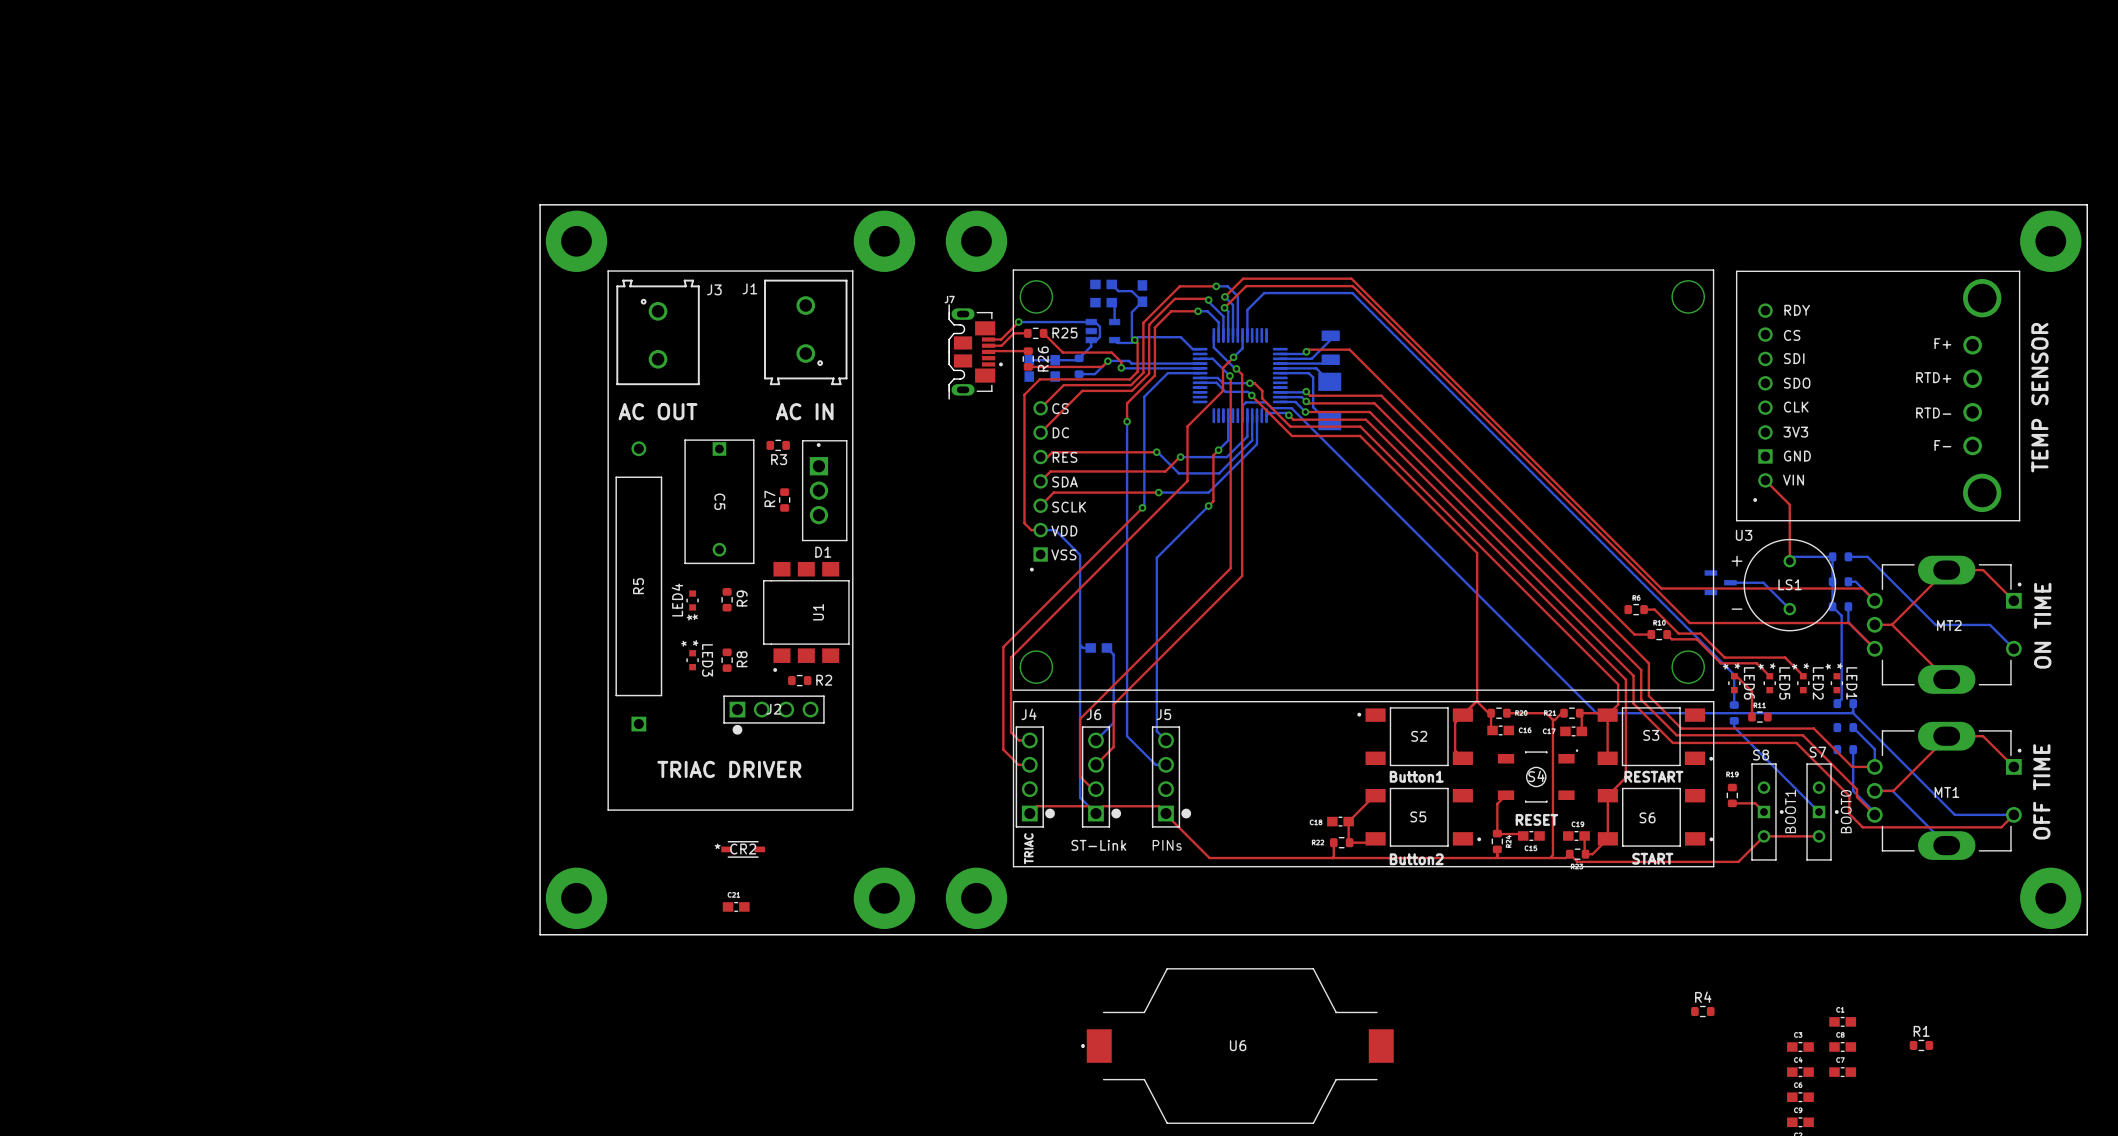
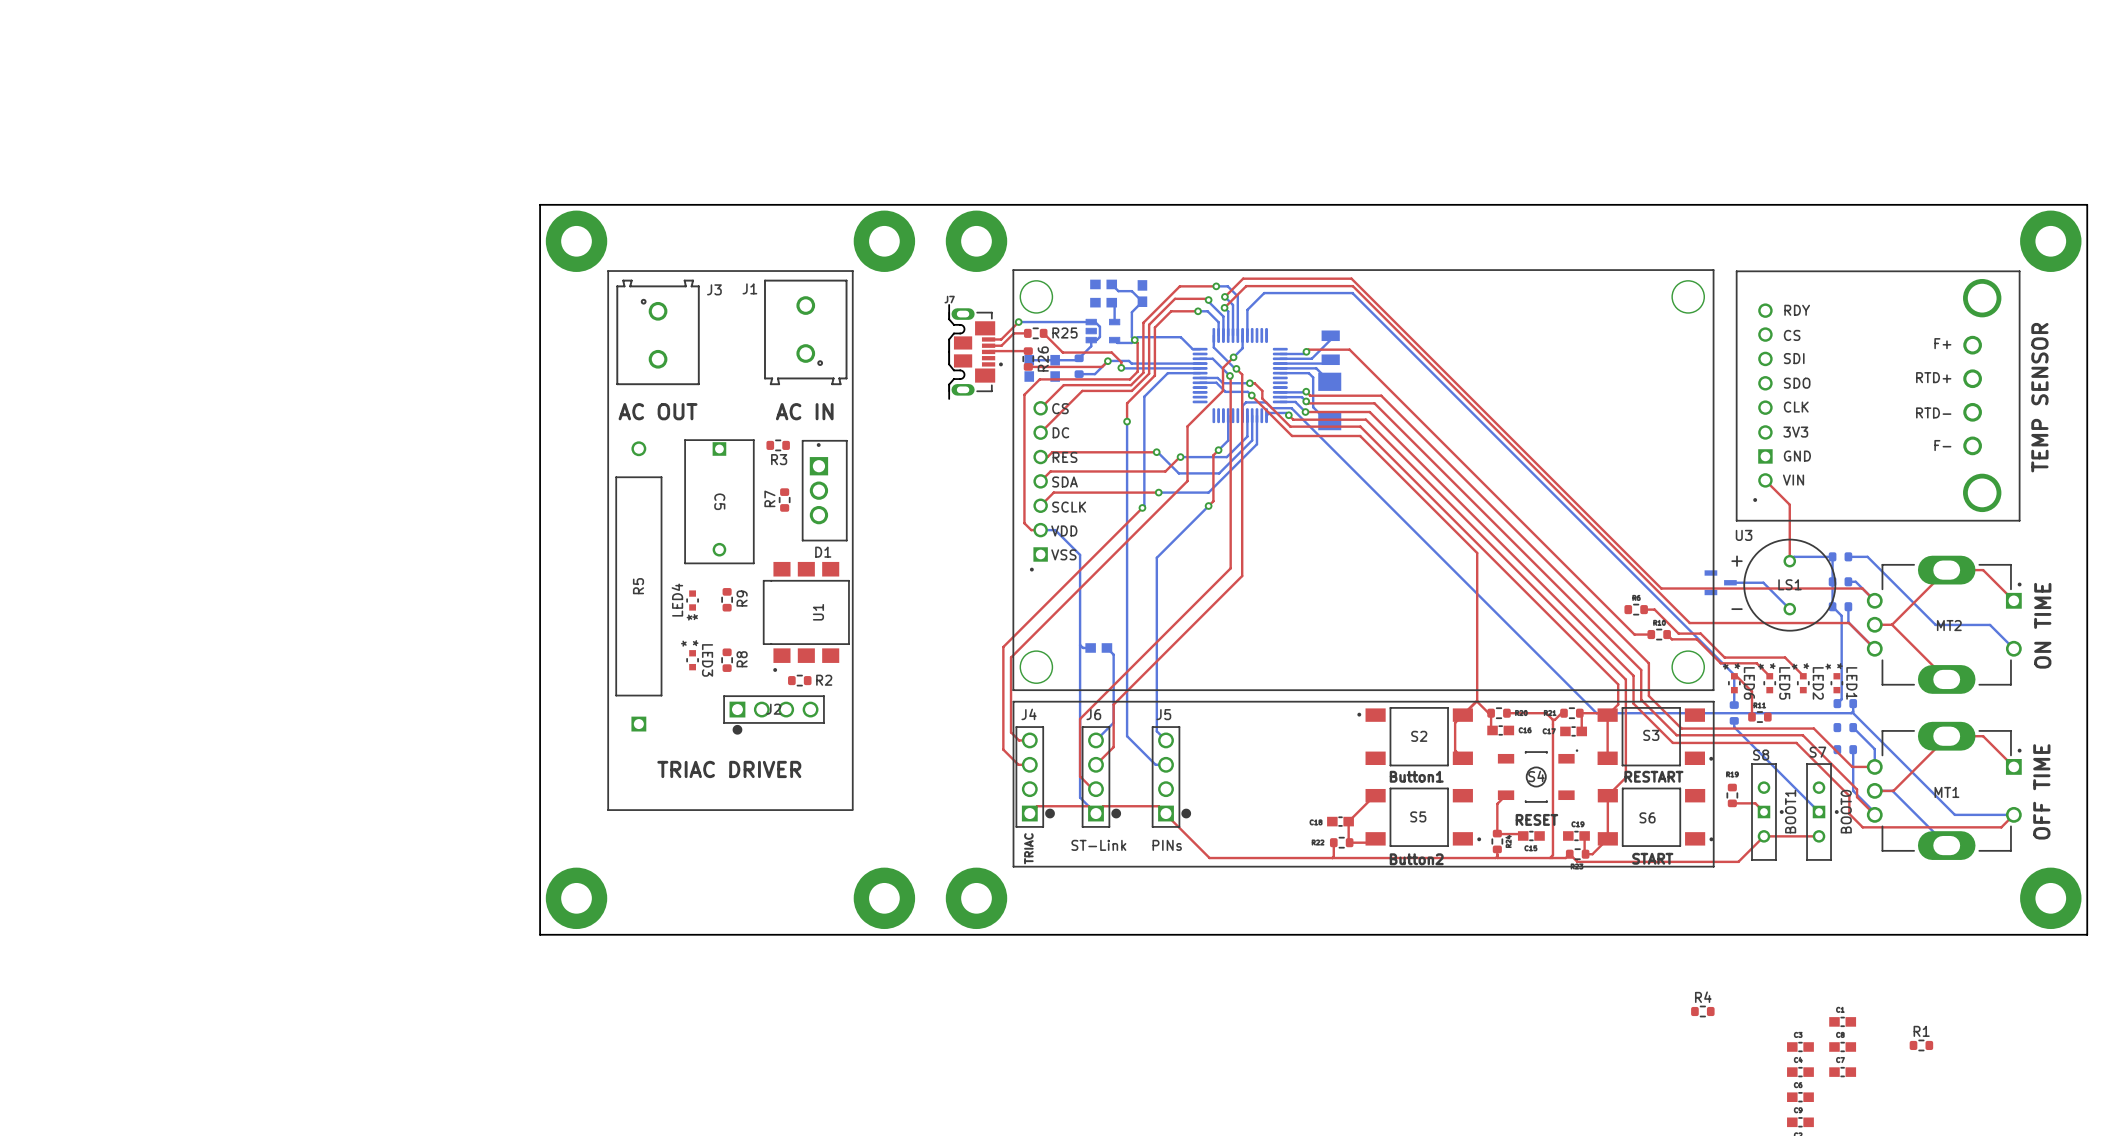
CR2: (743, 849) -> none
part: (736, 906) -> none
U6: (1237, 1046) -> none

